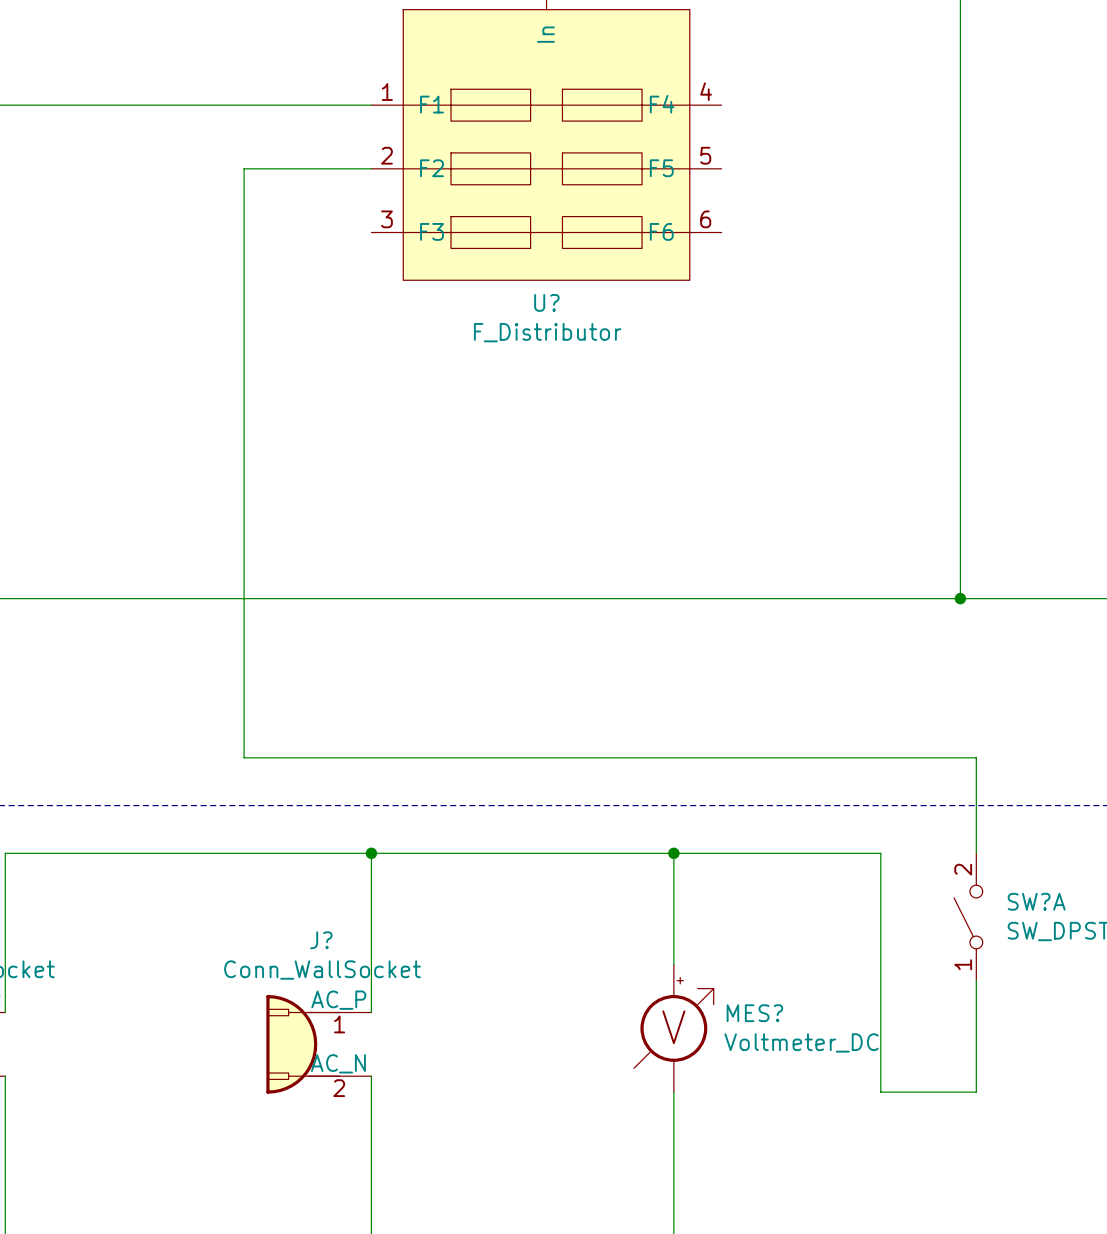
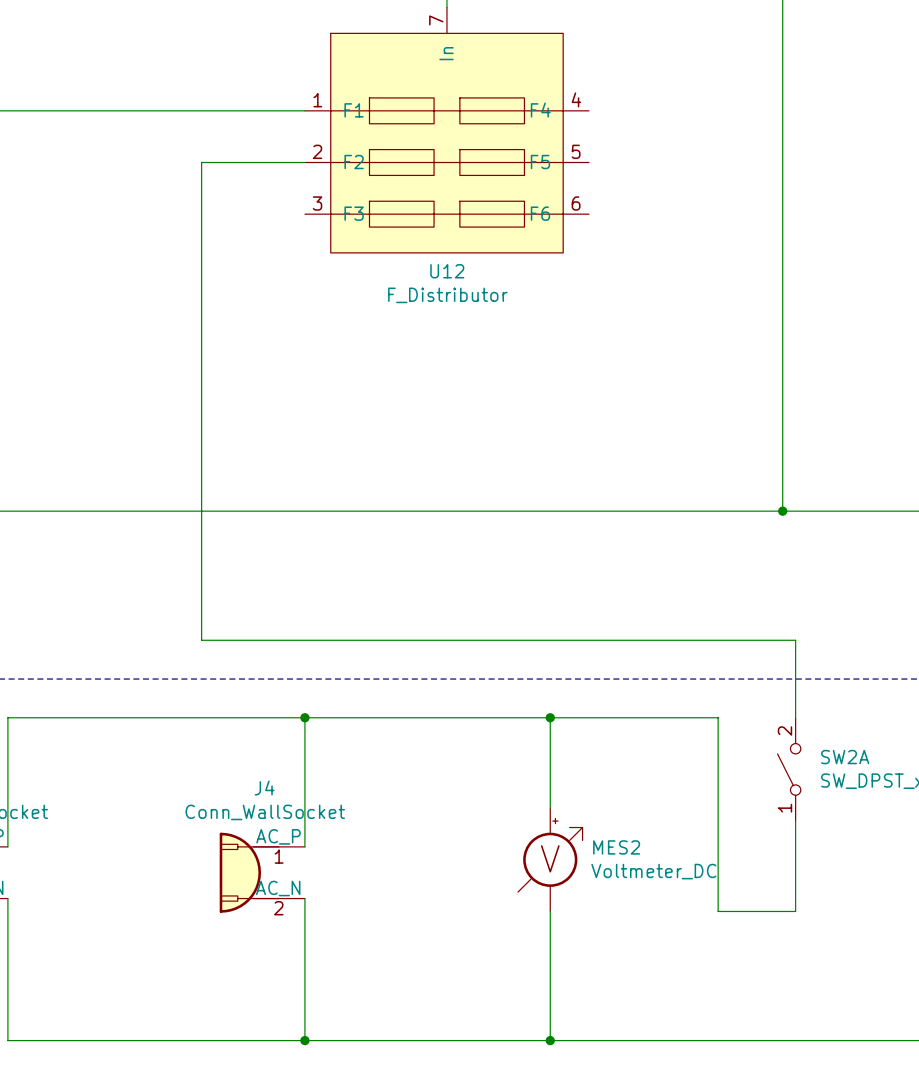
U? name: U? (546, 302) -> U12 (447, 271)
SW?A name: SW?A (1036, 901) -> SW2A (845, 757)
J? name: J? (321, 940) -> J4 (264, 788)
MES? name: MES? (754, 1013) -> MES2 (616, 847)

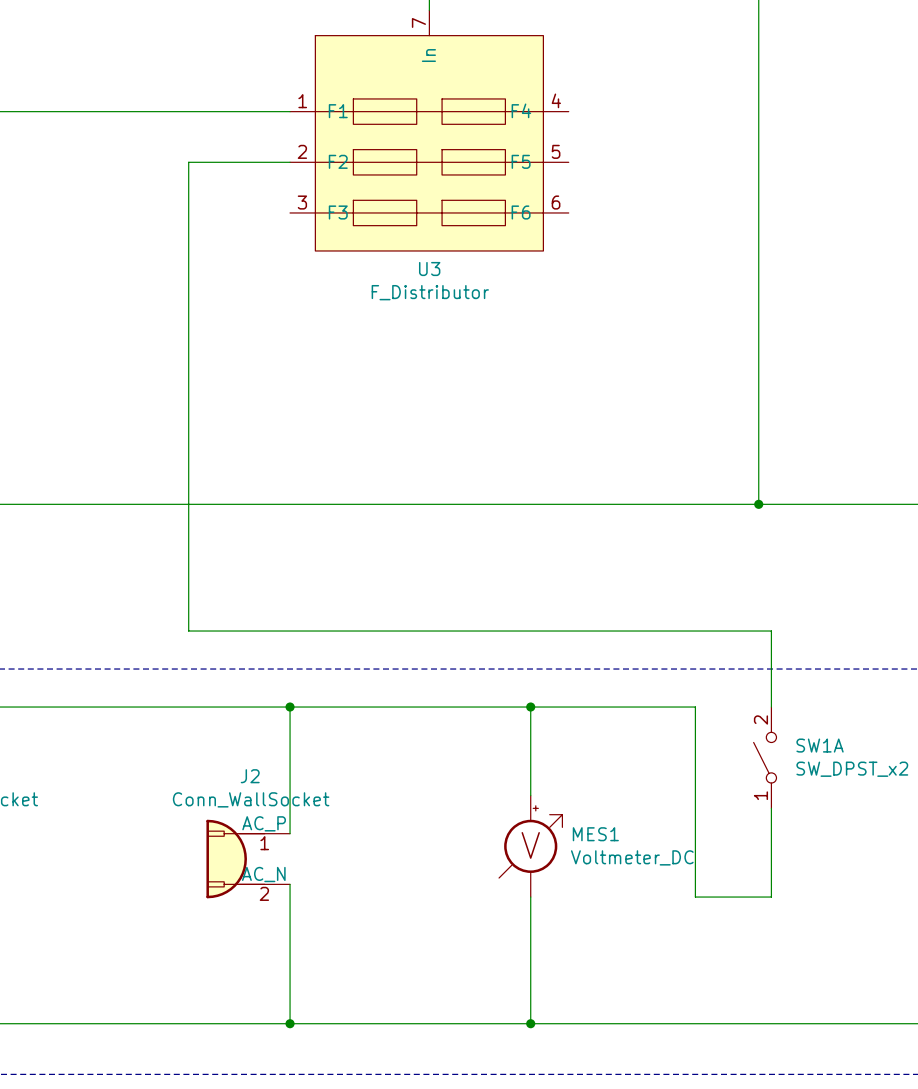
U12 name: U12 (447, 271) -> U3 (429, 269)
SW2A name: SW2A (845, 757) -> SW1A (820, 745)
J4 name: J4 (264, 788) -> J2 (250, 776)
MES2 name: MES2 (616, 847) -> MES1 (595, 834)

